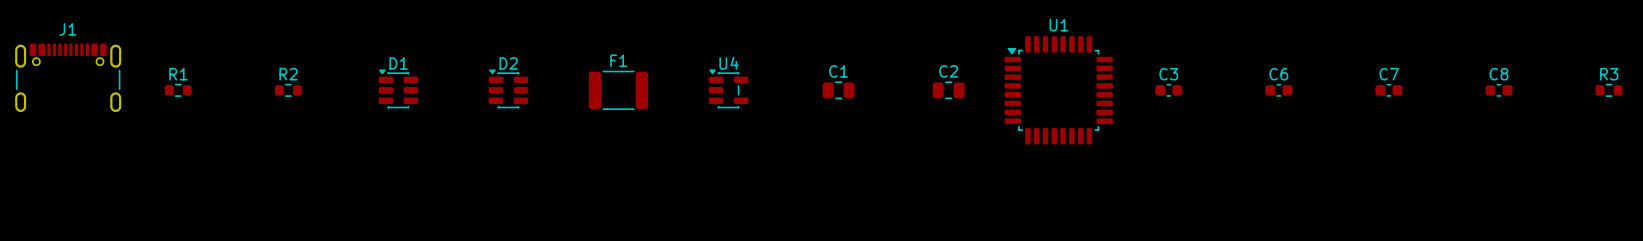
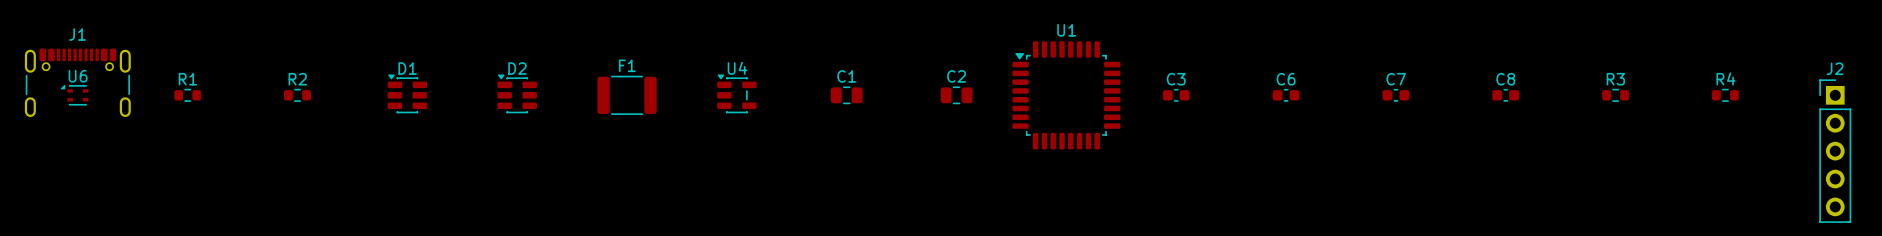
U6: none -> (74, 95)

